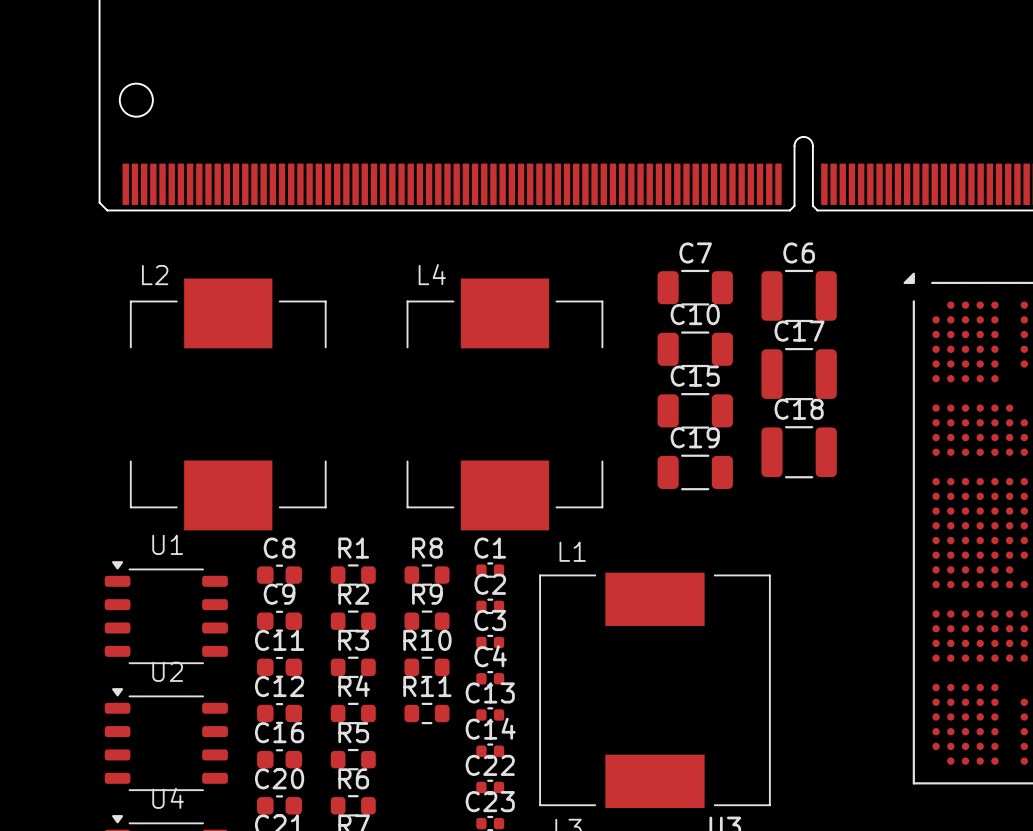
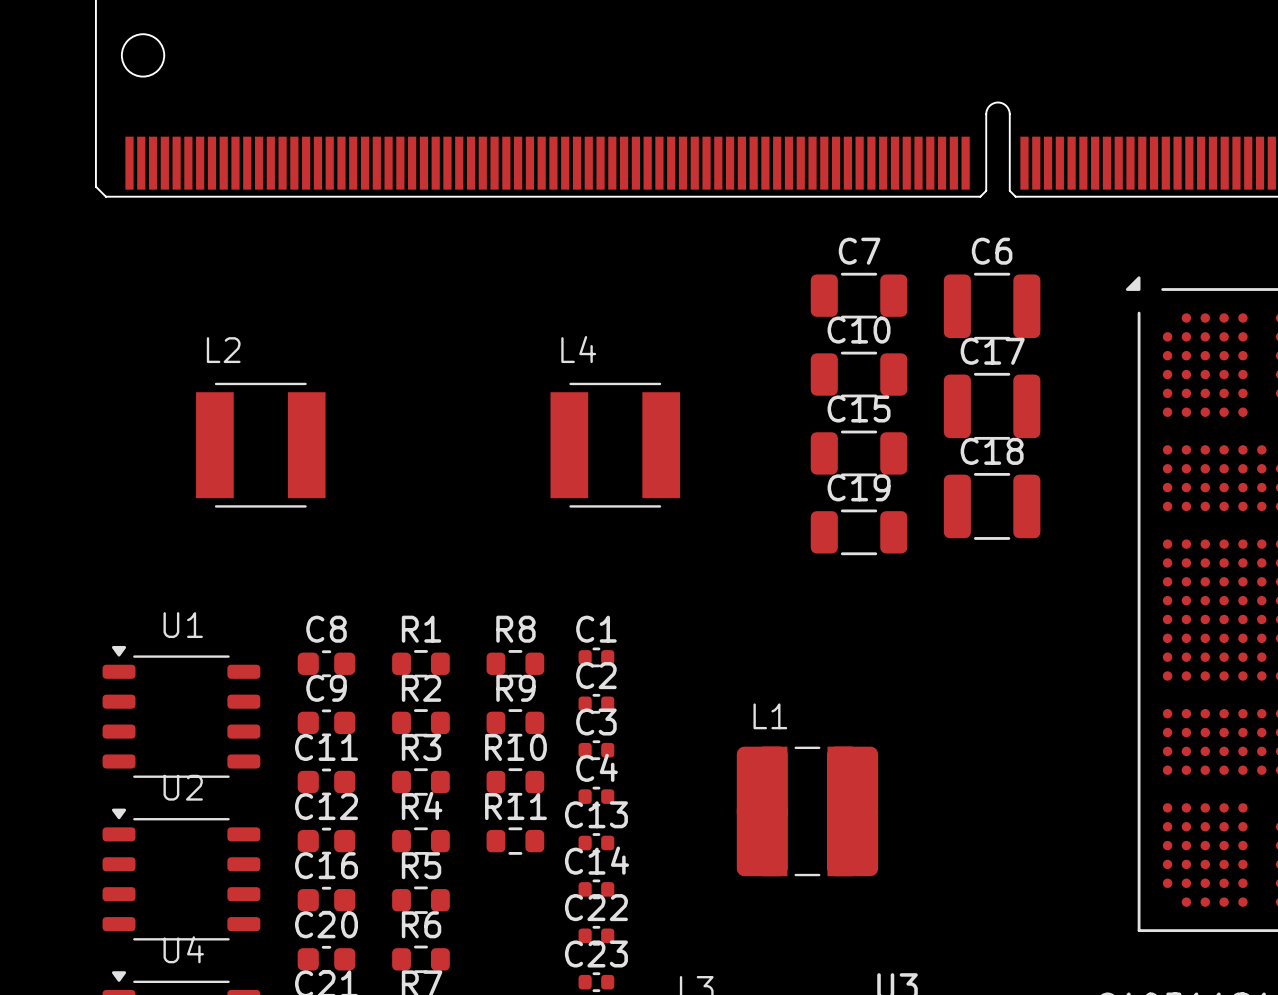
L4 name position: L4 (432, 274) -> L4 (578, 349)
L2 name position: L2 (155, 275) -> L2 (223, 350)
L2 footprint: [129, 278, 327, 531] -> [196, 382, 326, 508]
L4 footprint: [406, 278, 604, 531] -> [550, 382, 681, 508]
L1 name position: L1 (572, 551) -> L1 (770, 716)
L1 footprint: [539, 572, 771, 808] -> [736, 746, 879, 877]

